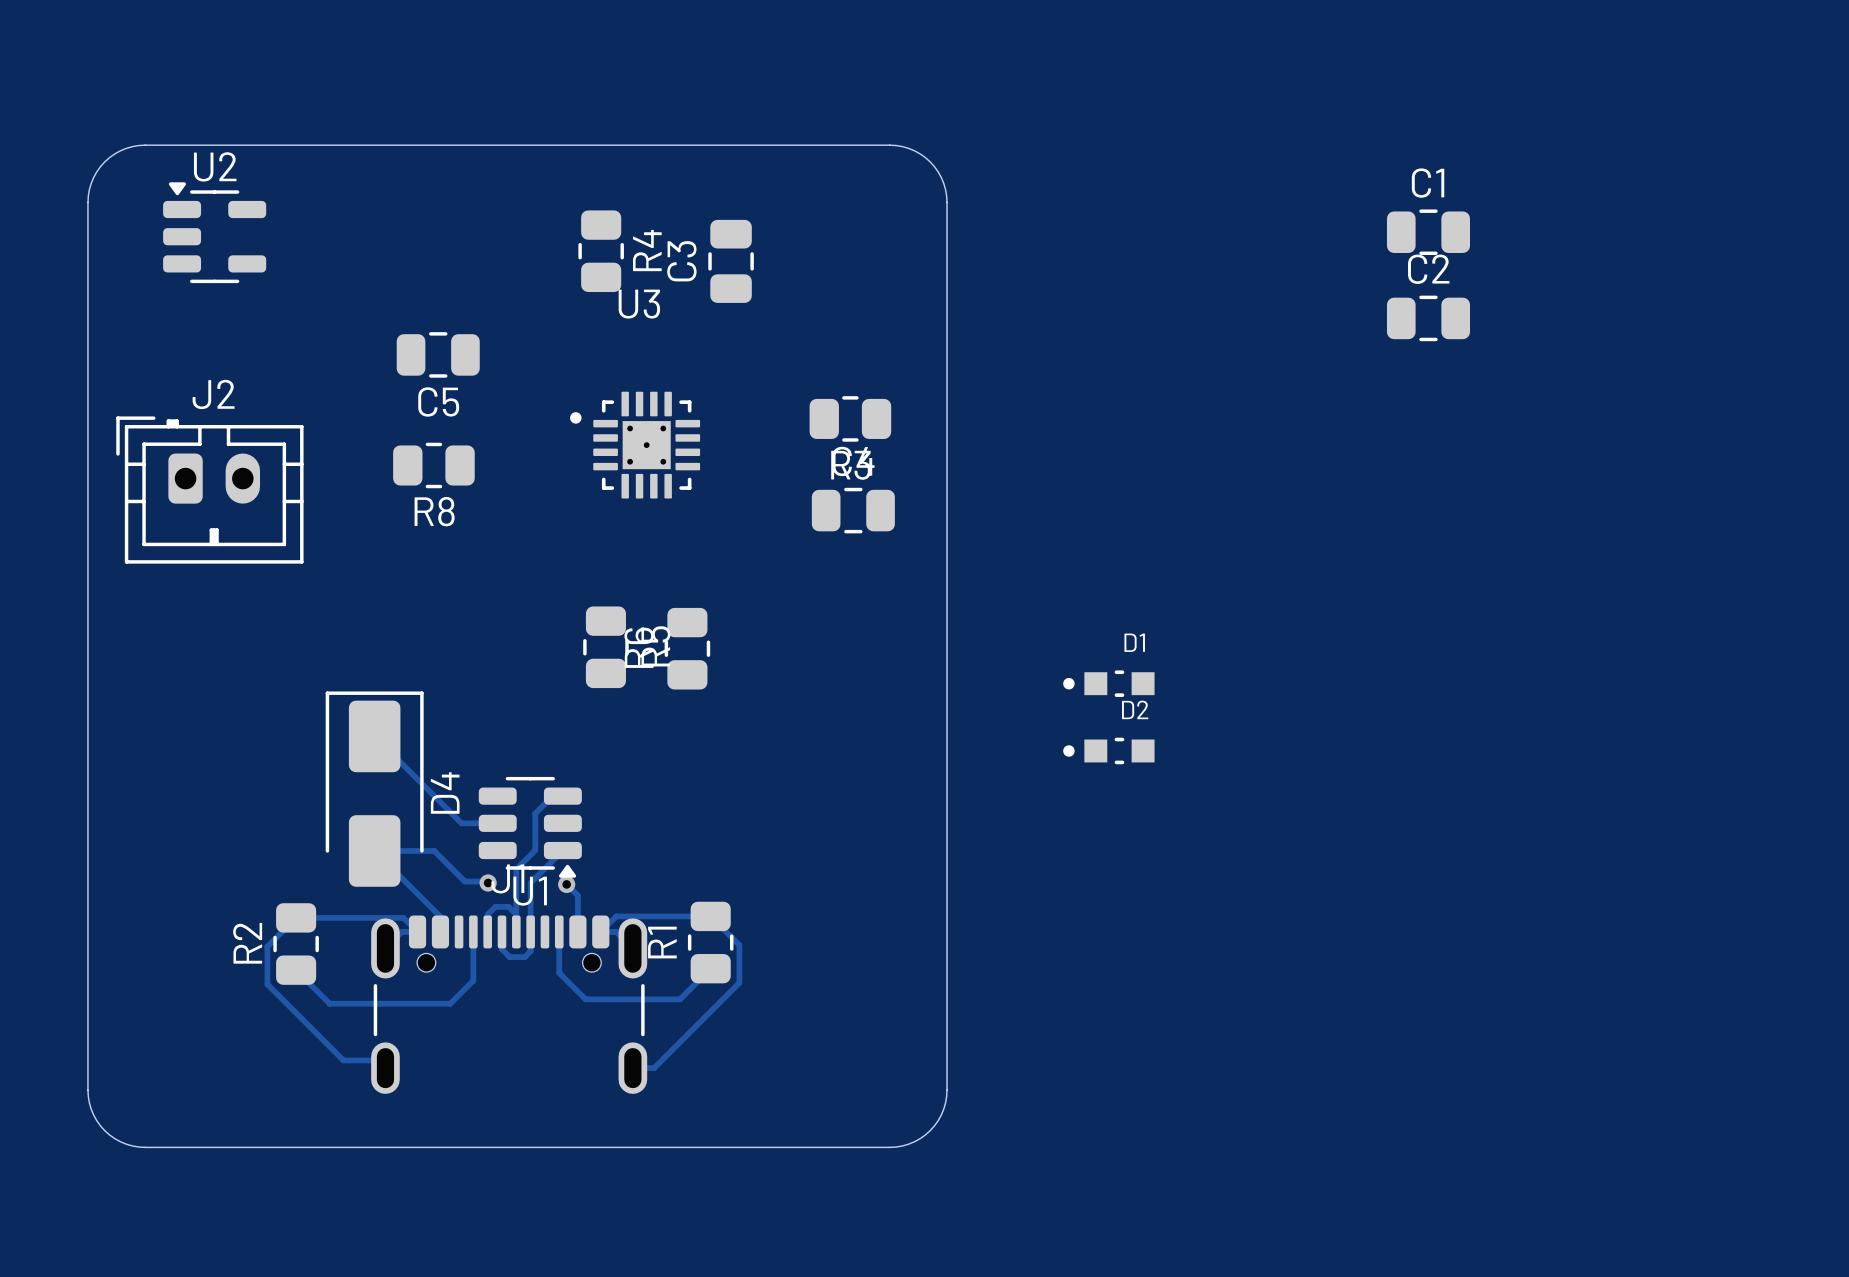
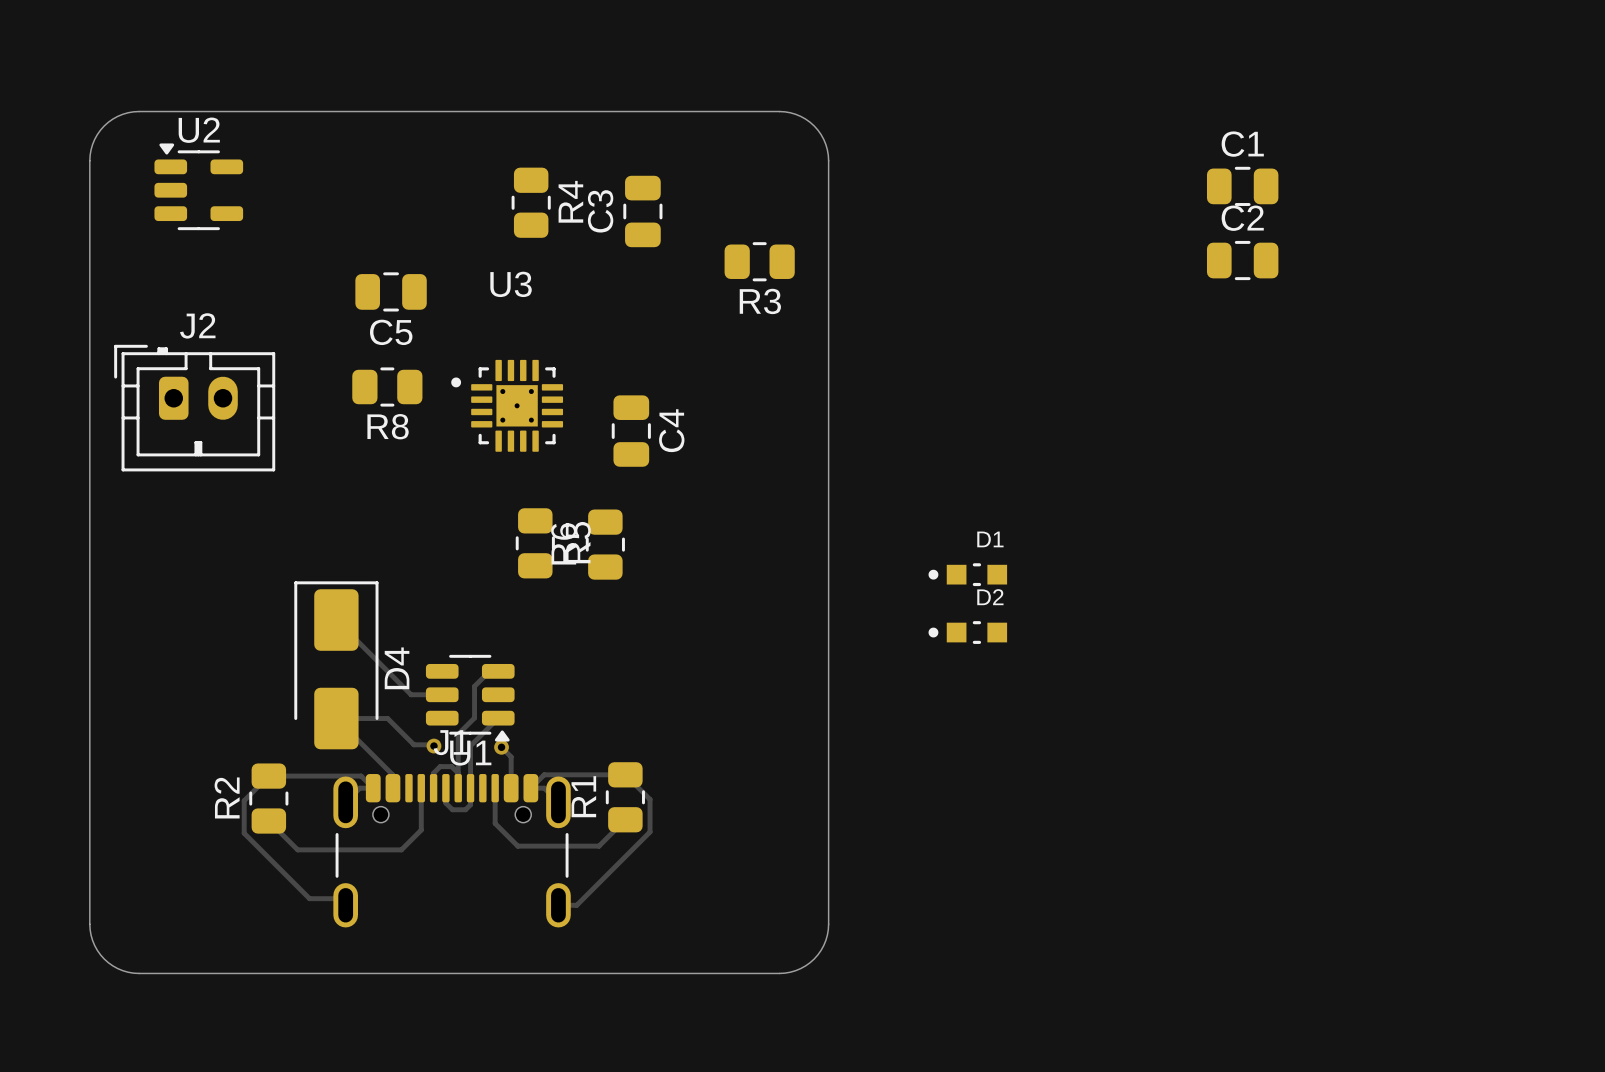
R3 position: (850, 418) -> (759, 261)
U3 position: (635, 445) -> (507, 405)
C4 rotation: 0° (853, 510) -> 90° clockwise (631, 431)
C4 position: (853, 510) -> (631, 431)

